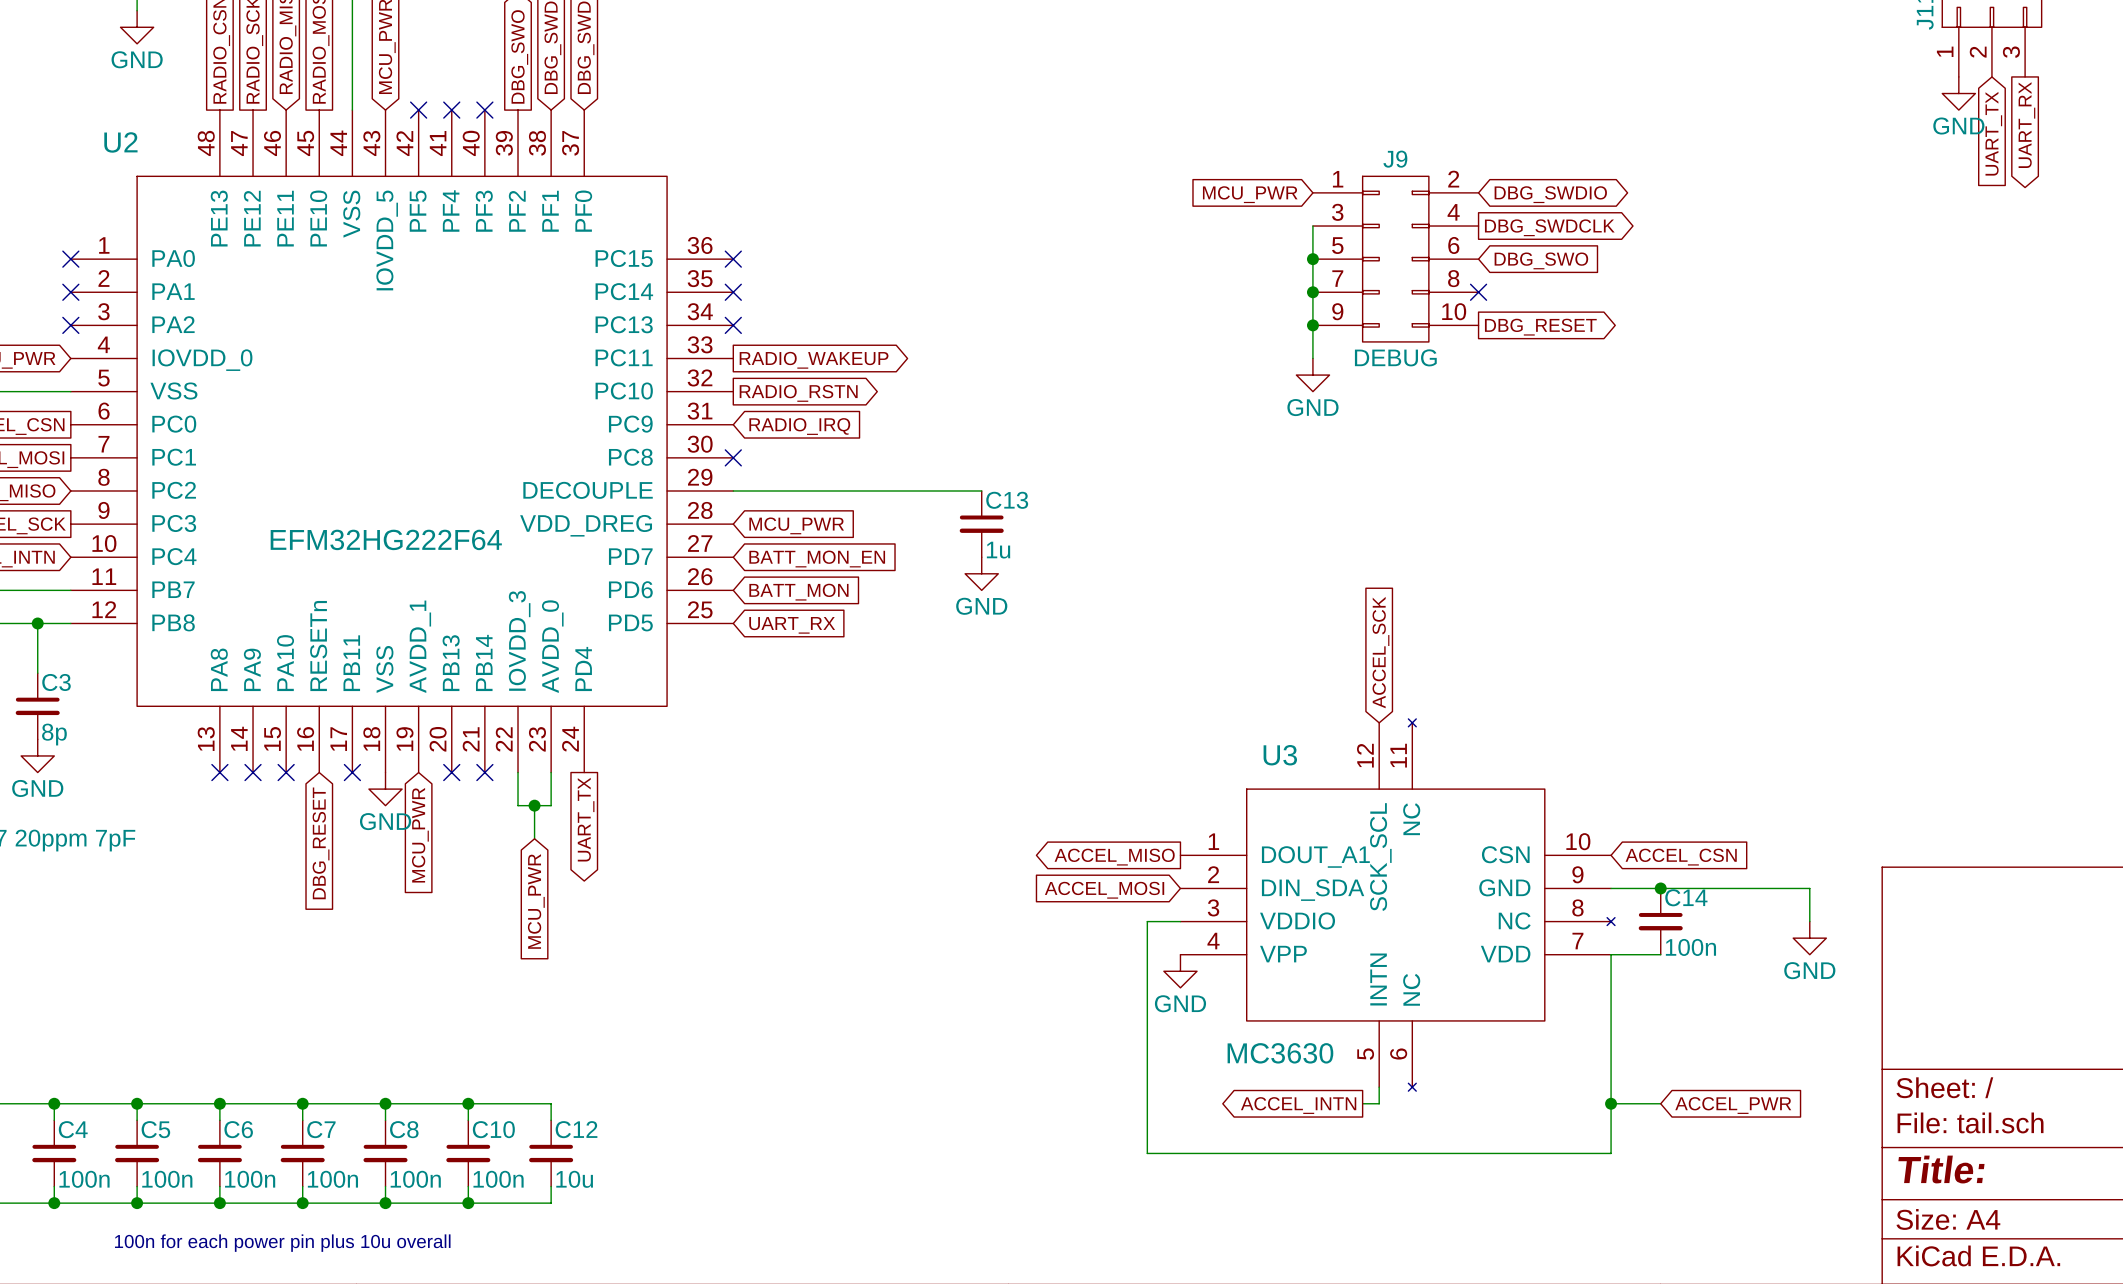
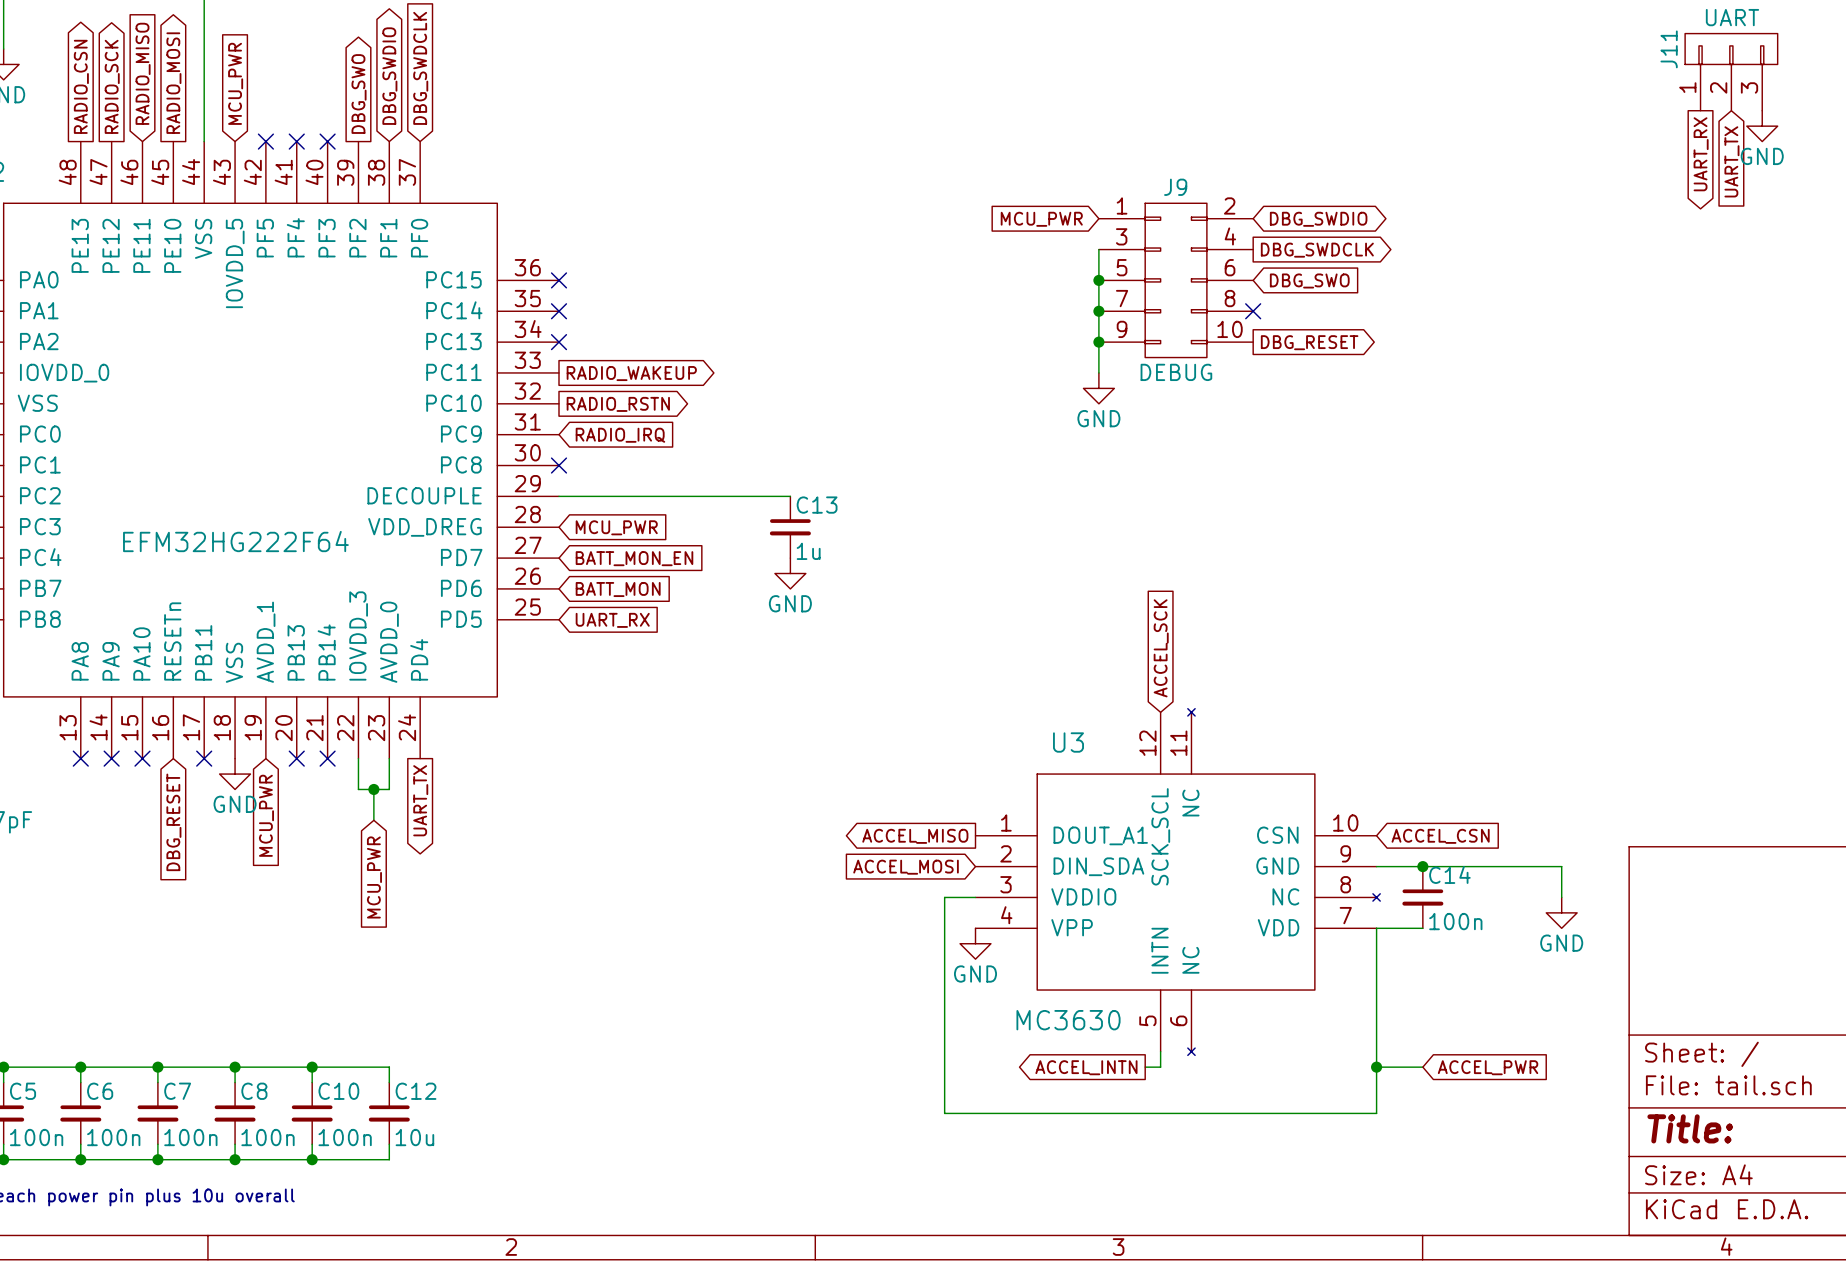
power symbol position: GND (1958, 93) -> GND (1762, 126)
global label position: UART_RX (2026, 125) -> UART_RX (1701, 154)

